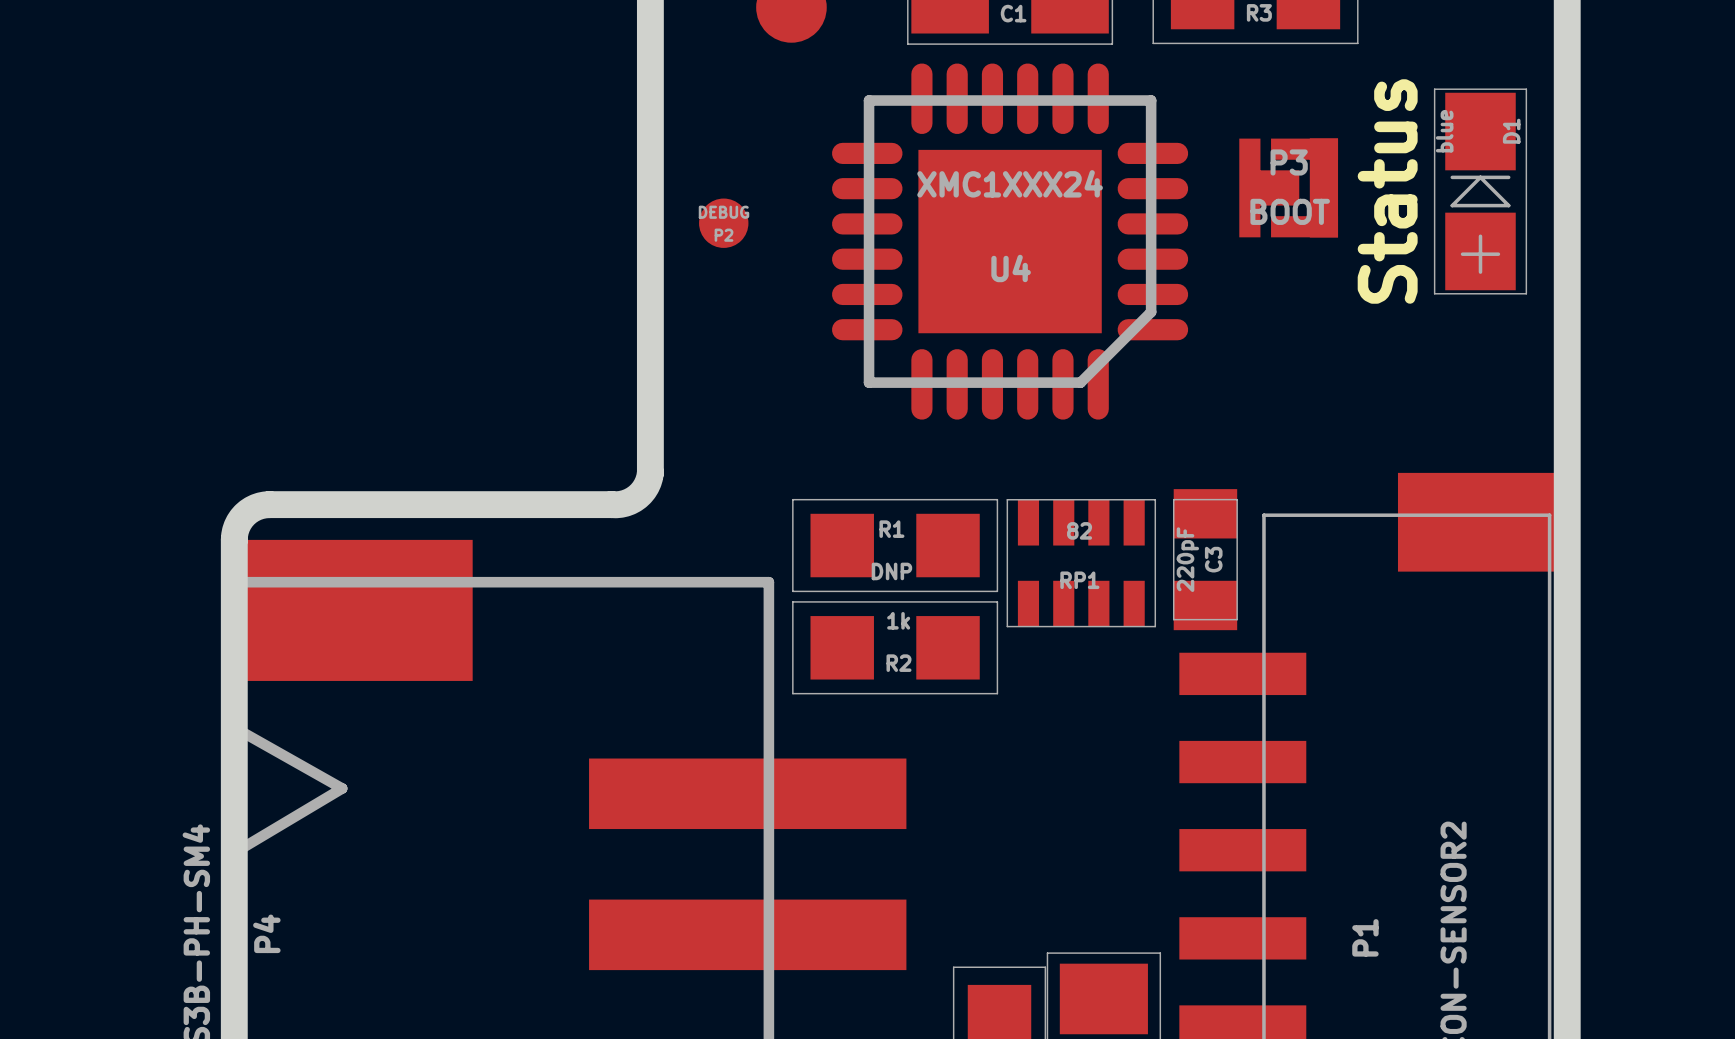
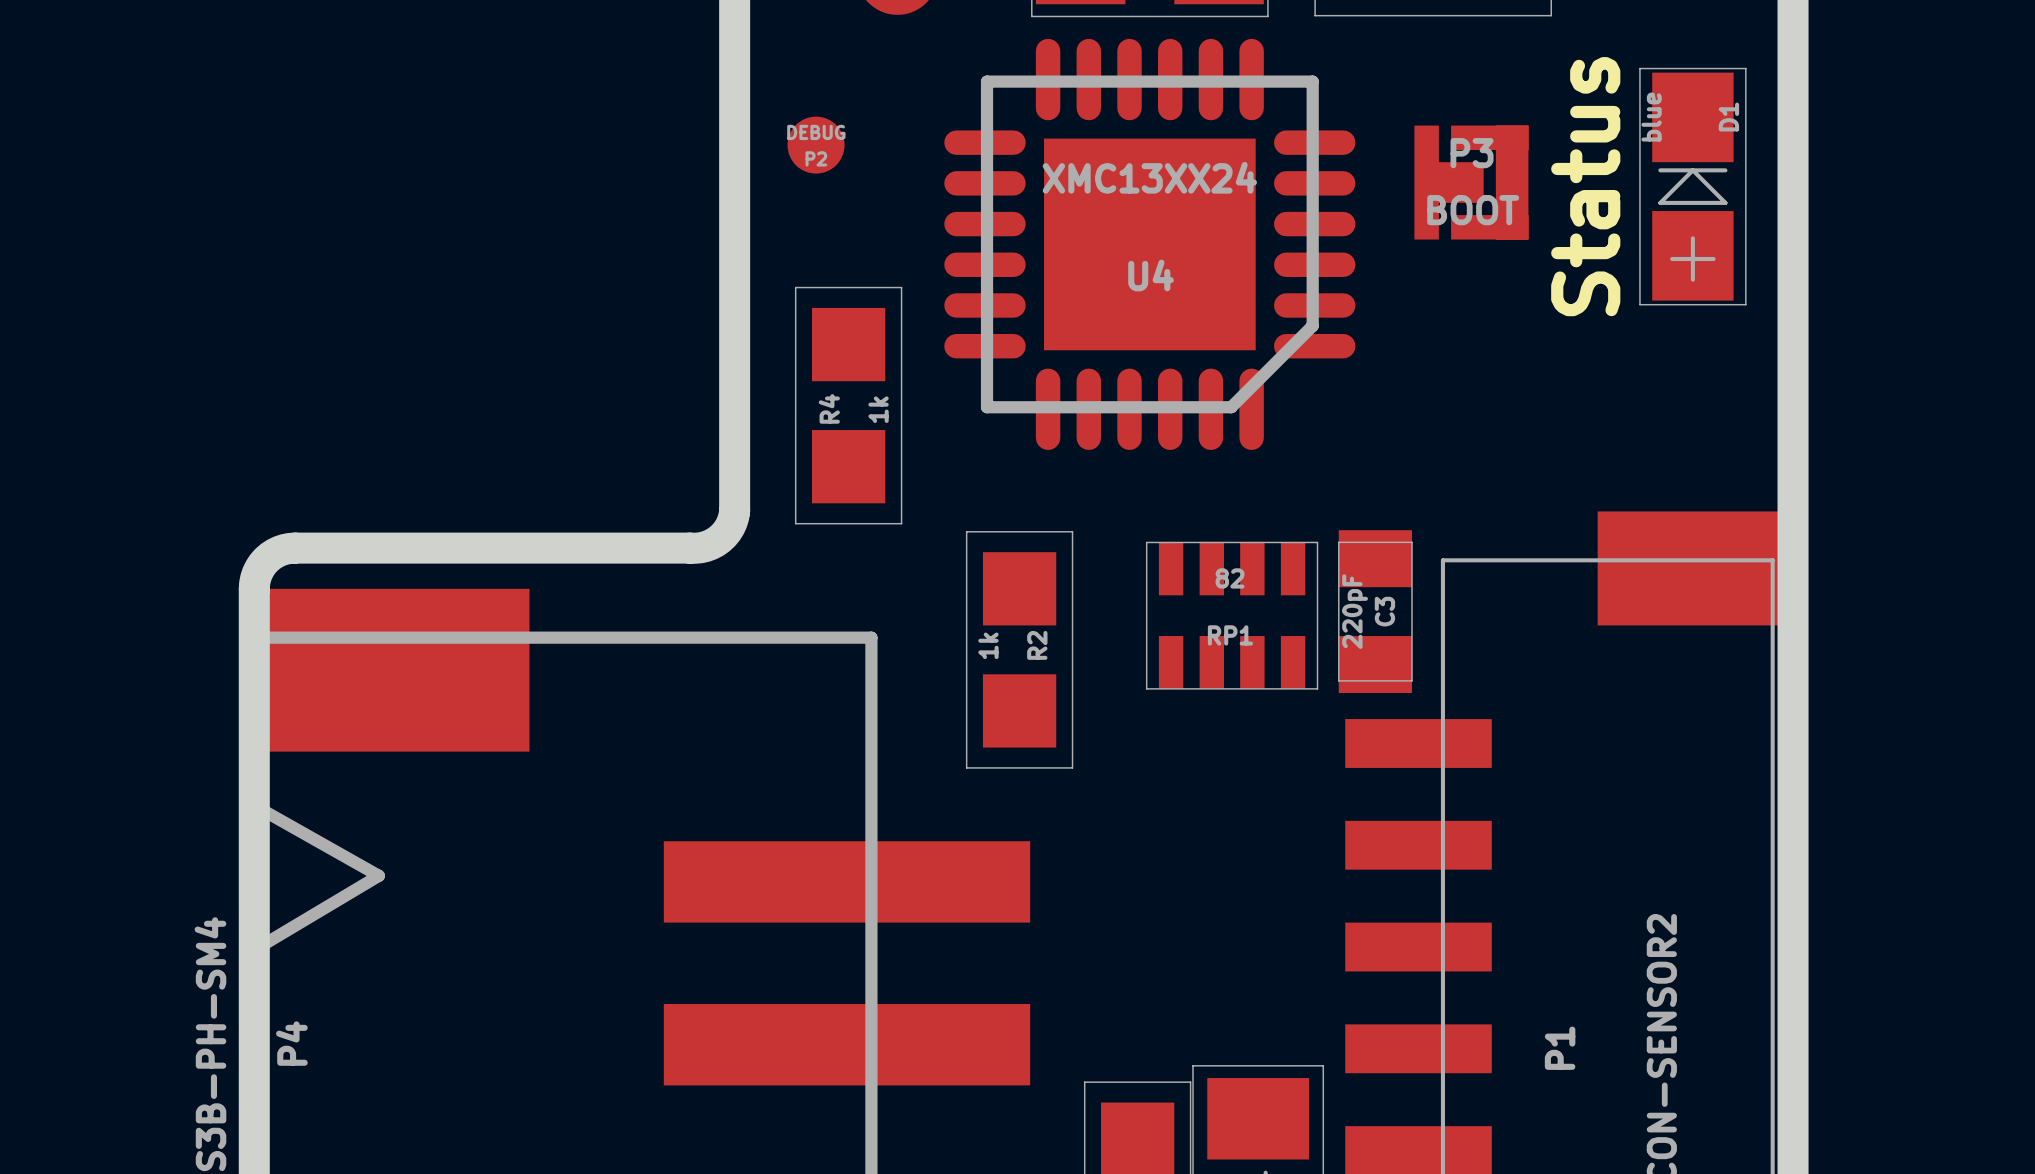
U4 value: XMC1XXX24 (1010, 183) -> XMC13XX24 (1149, 177)
P2 position: (723, 223) -> (816, 145)
R4: none -> 1k (848, 405)
R1: DNP (895, 545) -> none
R2 rotation: 0° (895, 647) -> 90° clockwise (1019, 649)

